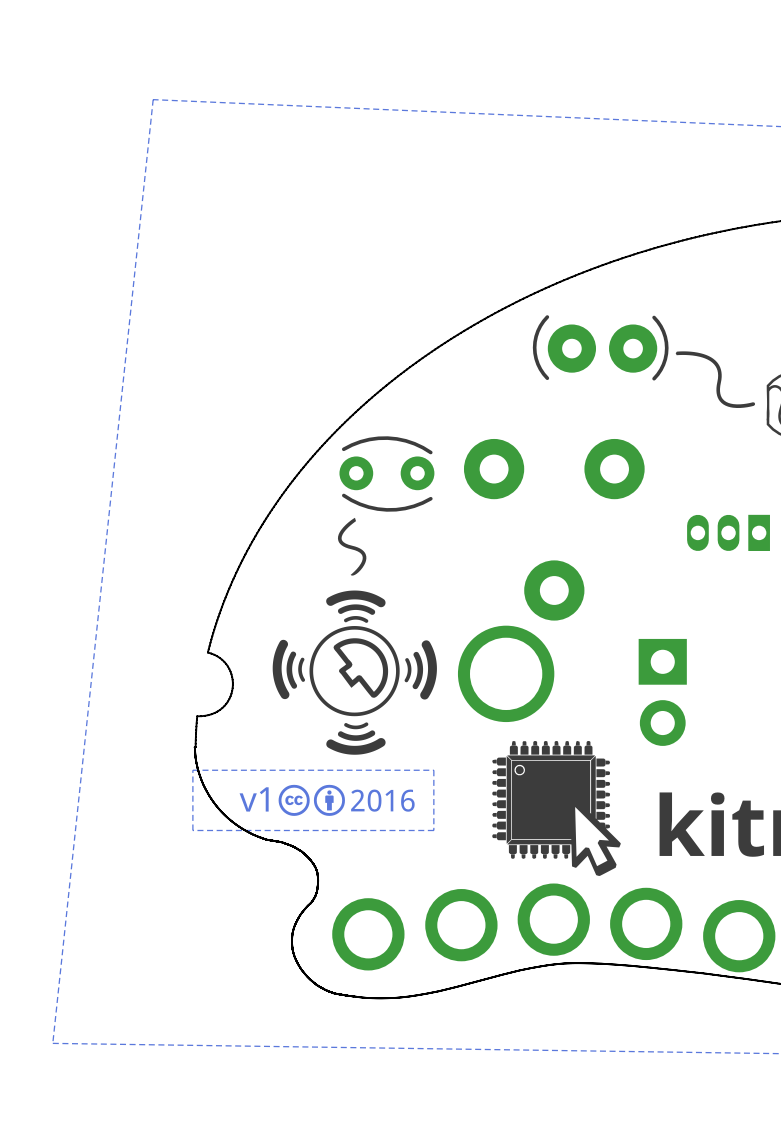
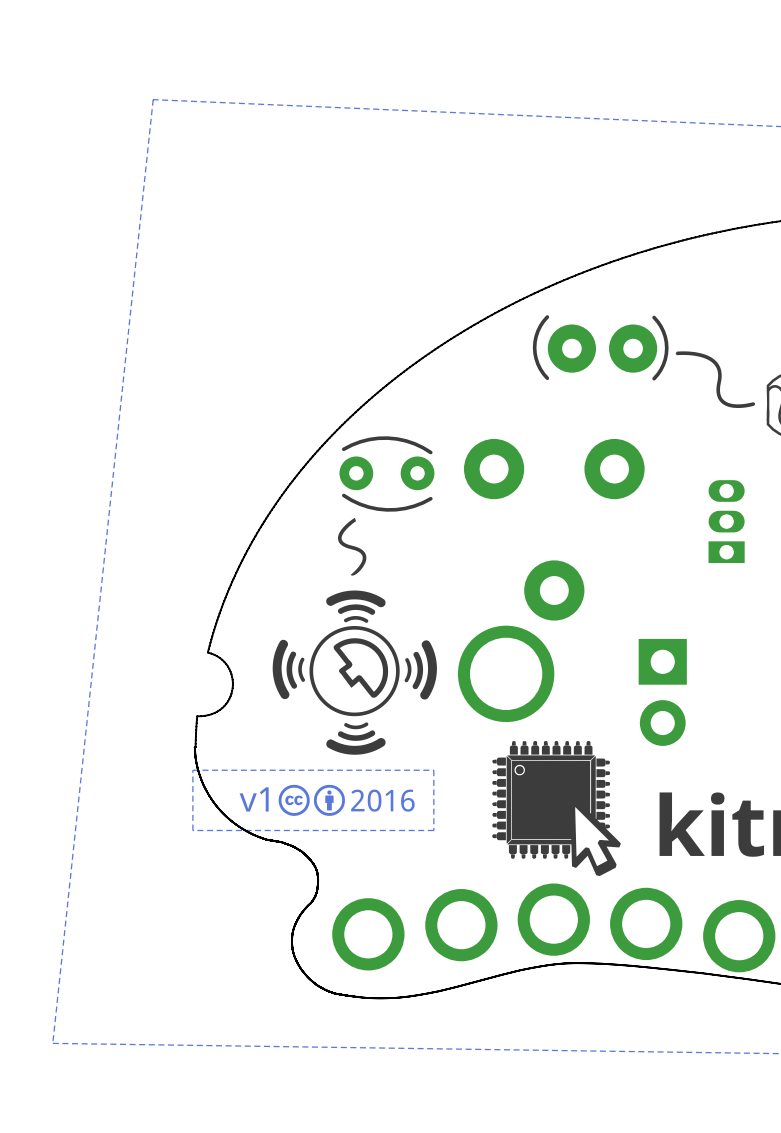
part rotation: 0° (728, 532) -> 90° clockwise (726, 521)

